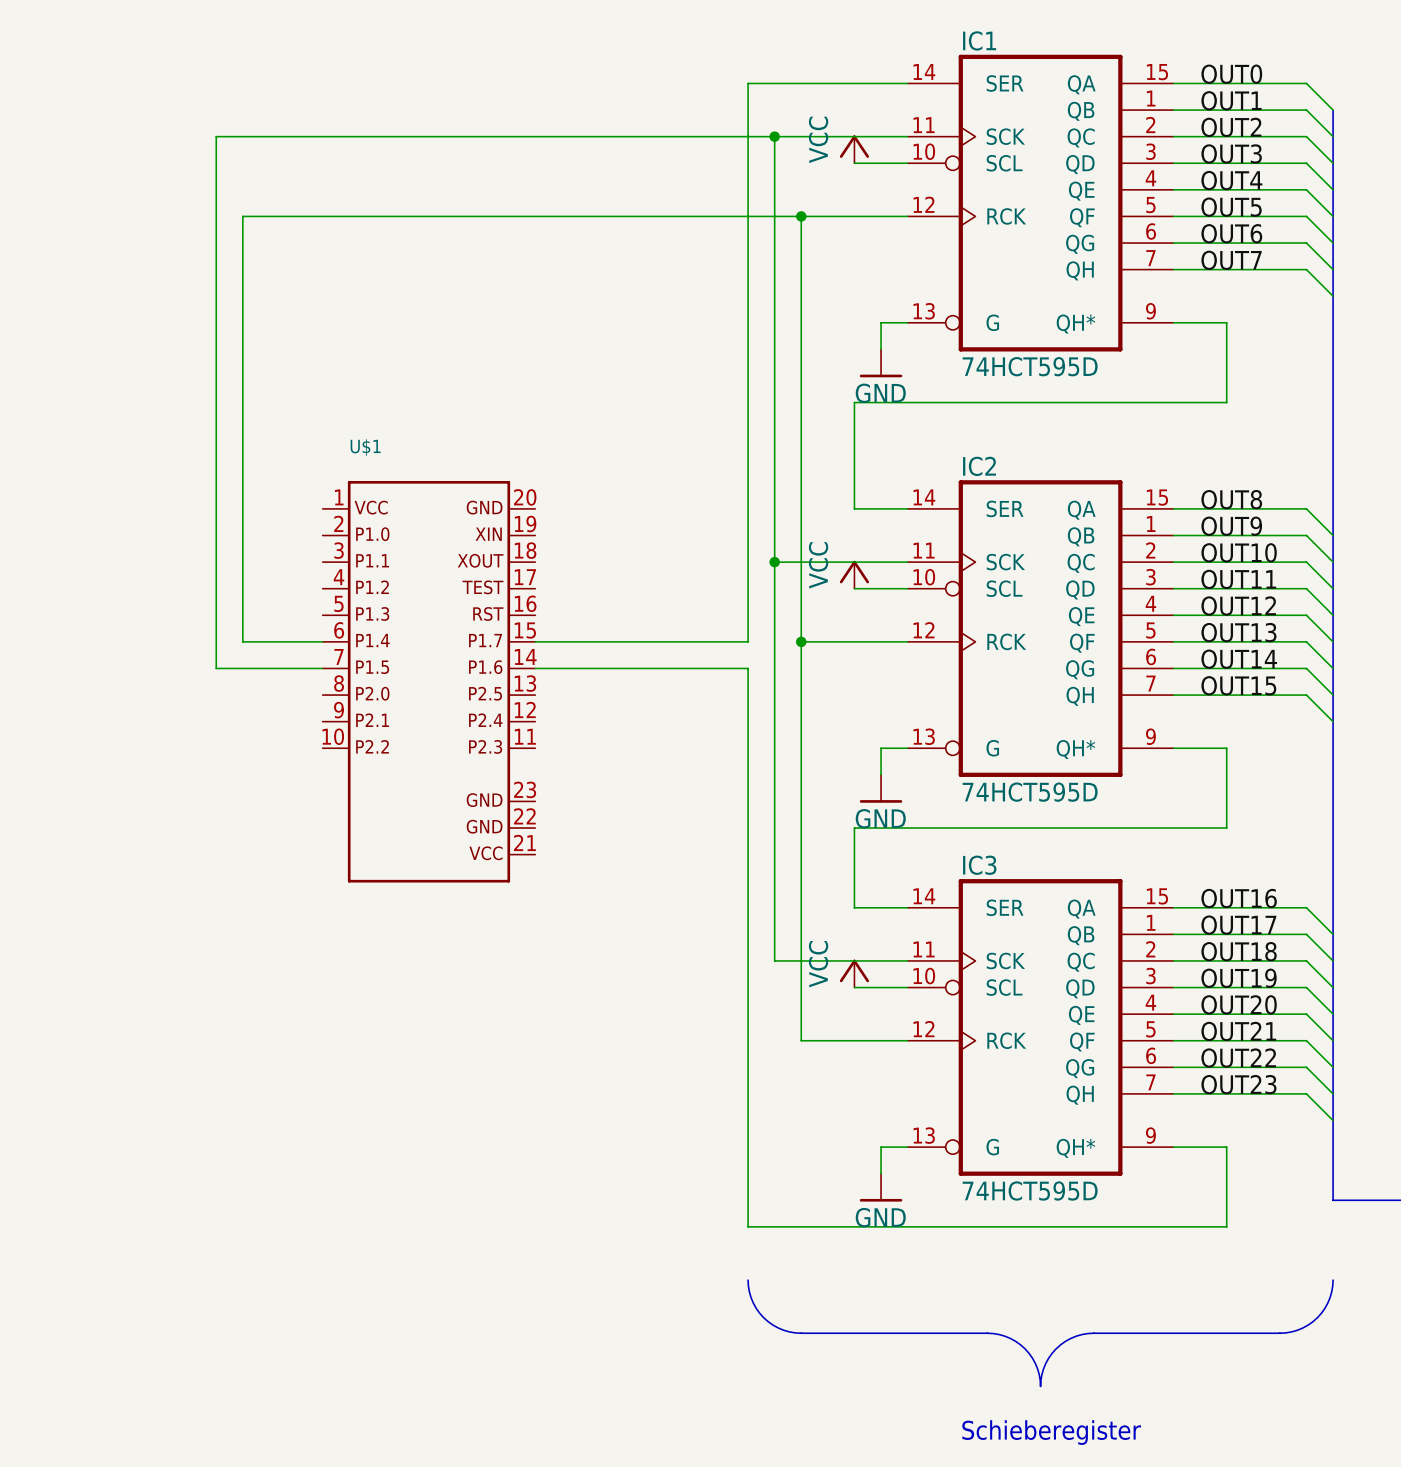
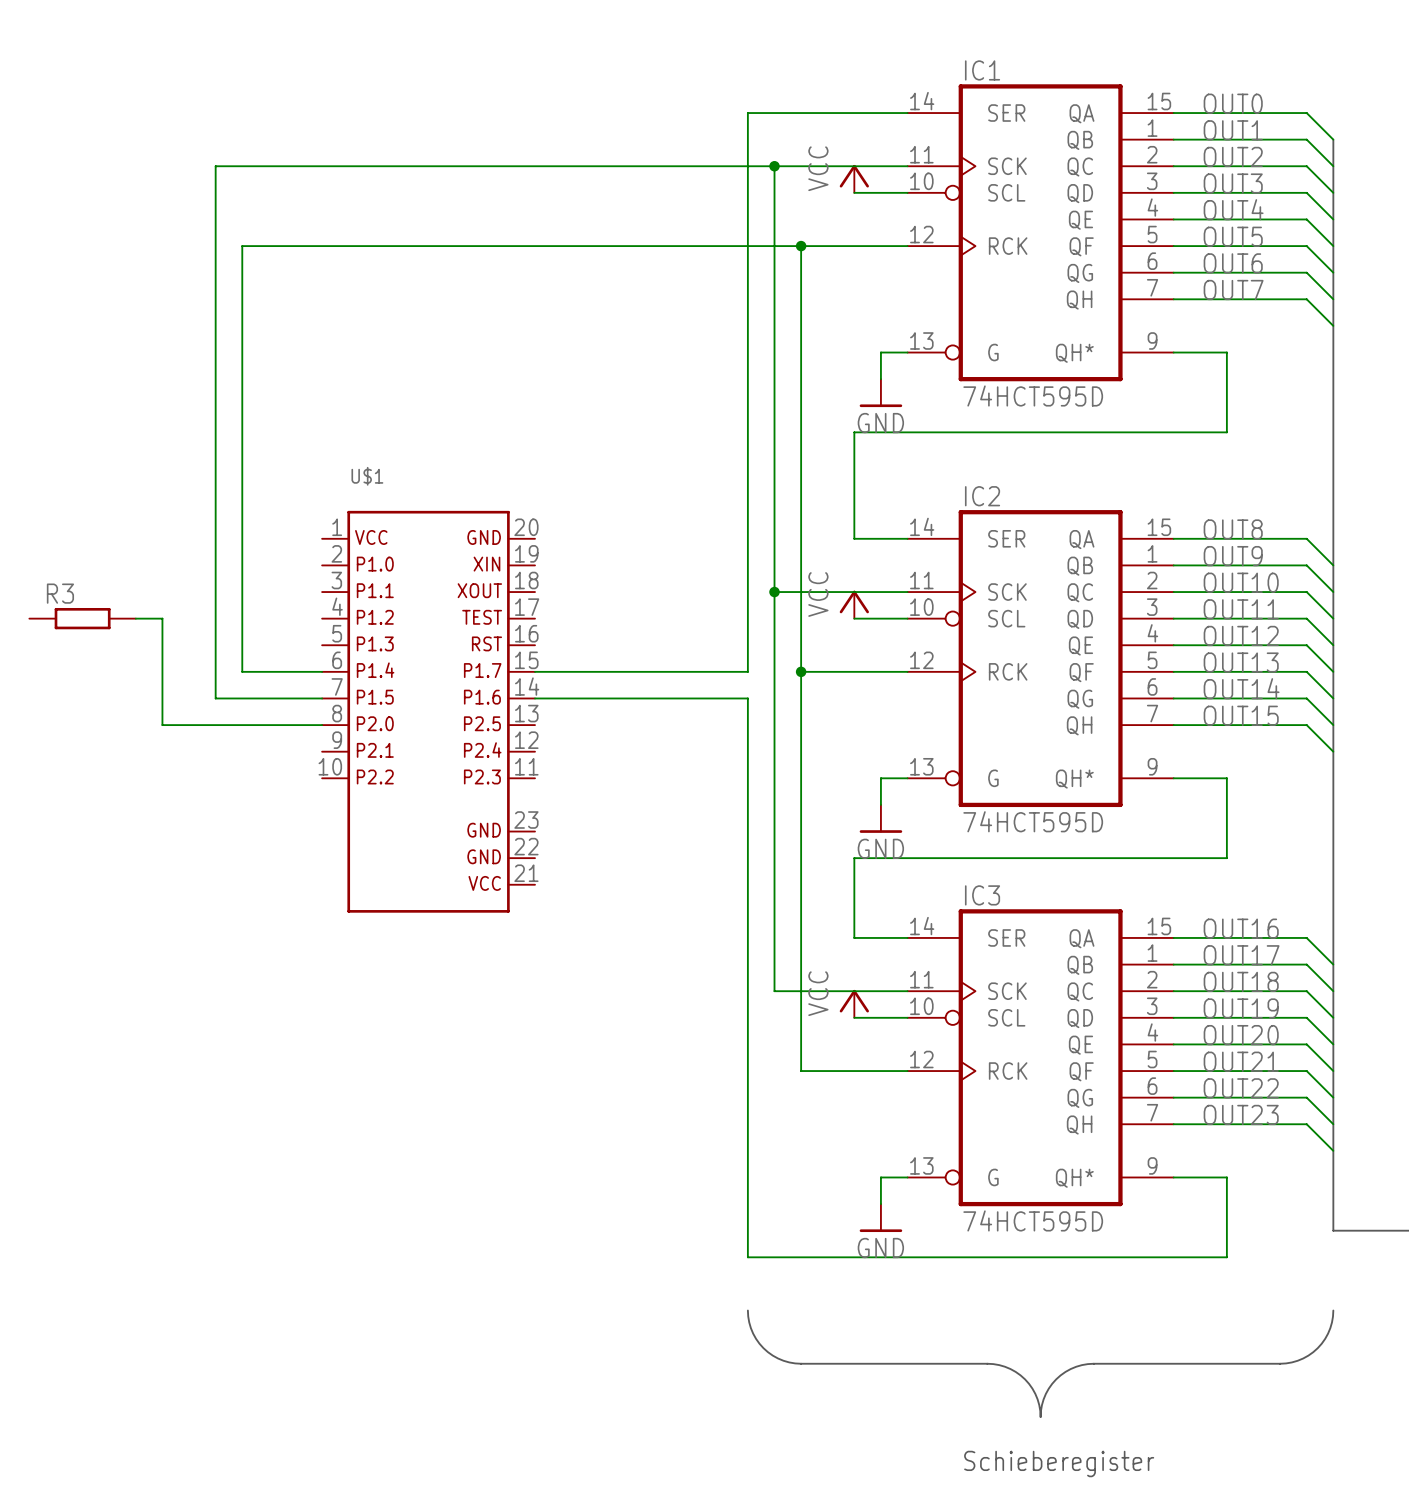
R3: none -> (82, 618)
wire: none -> (135, 618) (162, 618) (162, 725) (322, 725)

